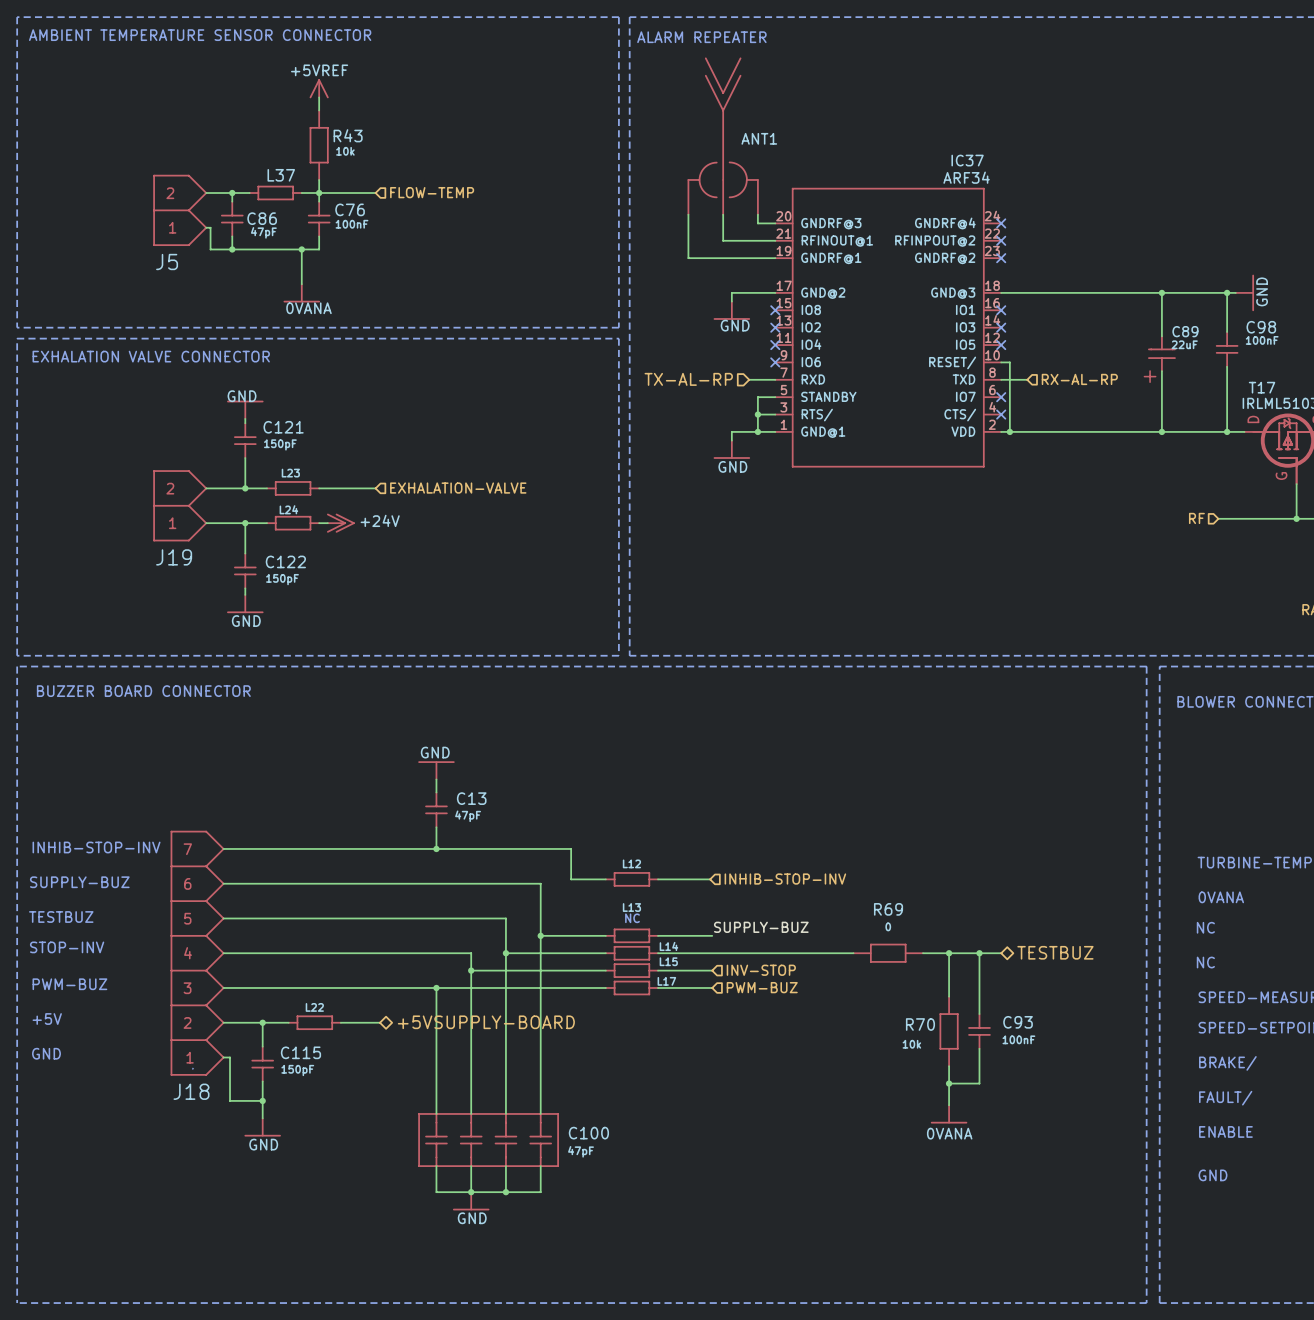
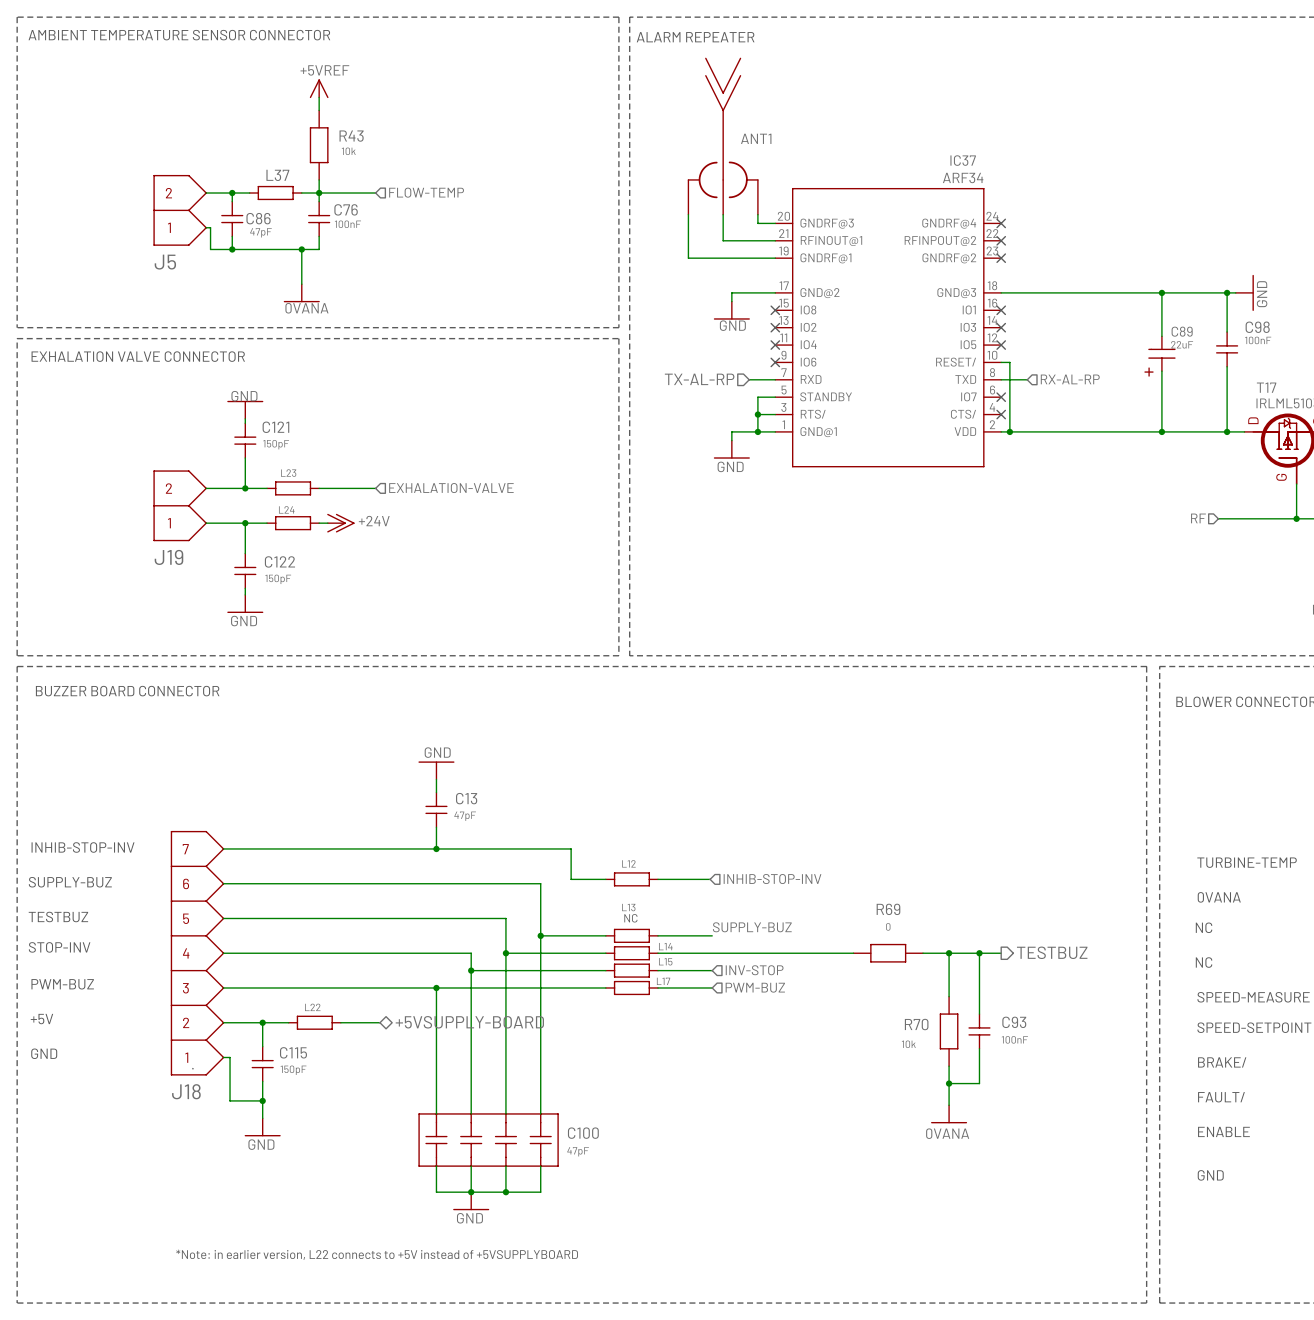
hierarchical label shape: bidirectional (1055, 952) -> output (1052, 952)
text: none -> *Note: in earlier version, L22 connects to +5V instead of +5VSUPPLYBOARD (377, 1254)

